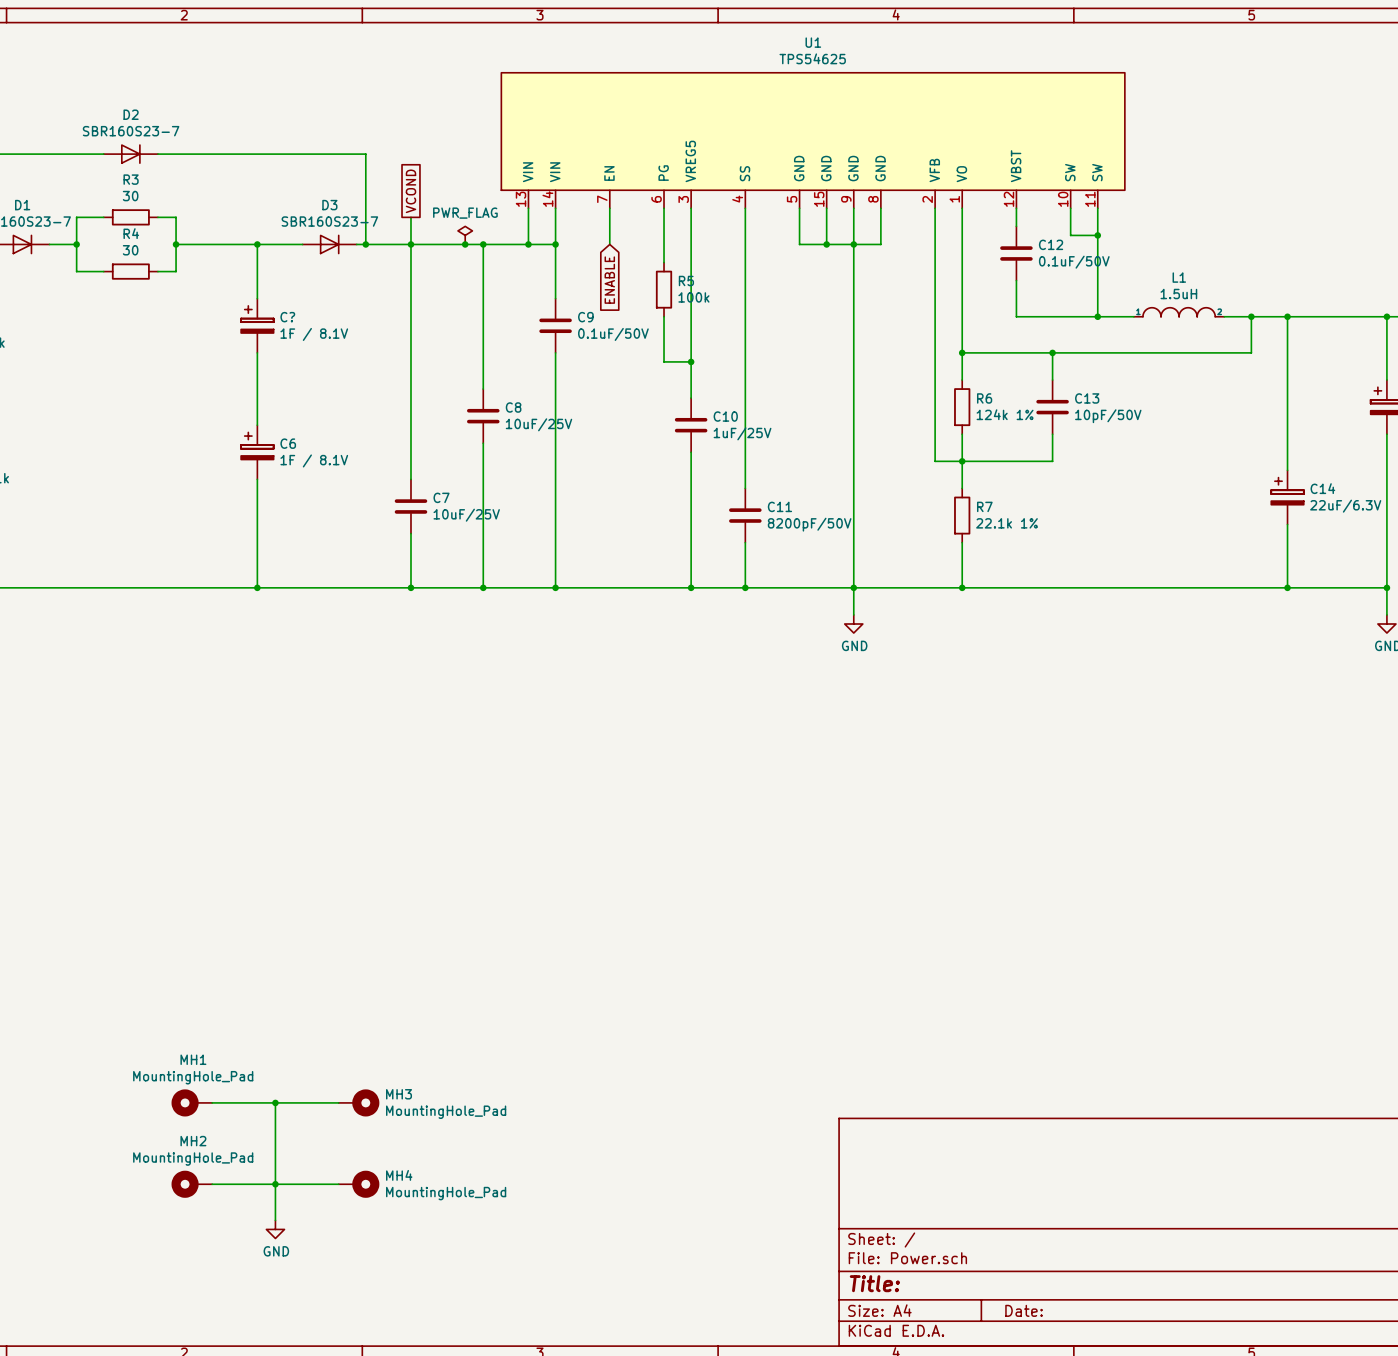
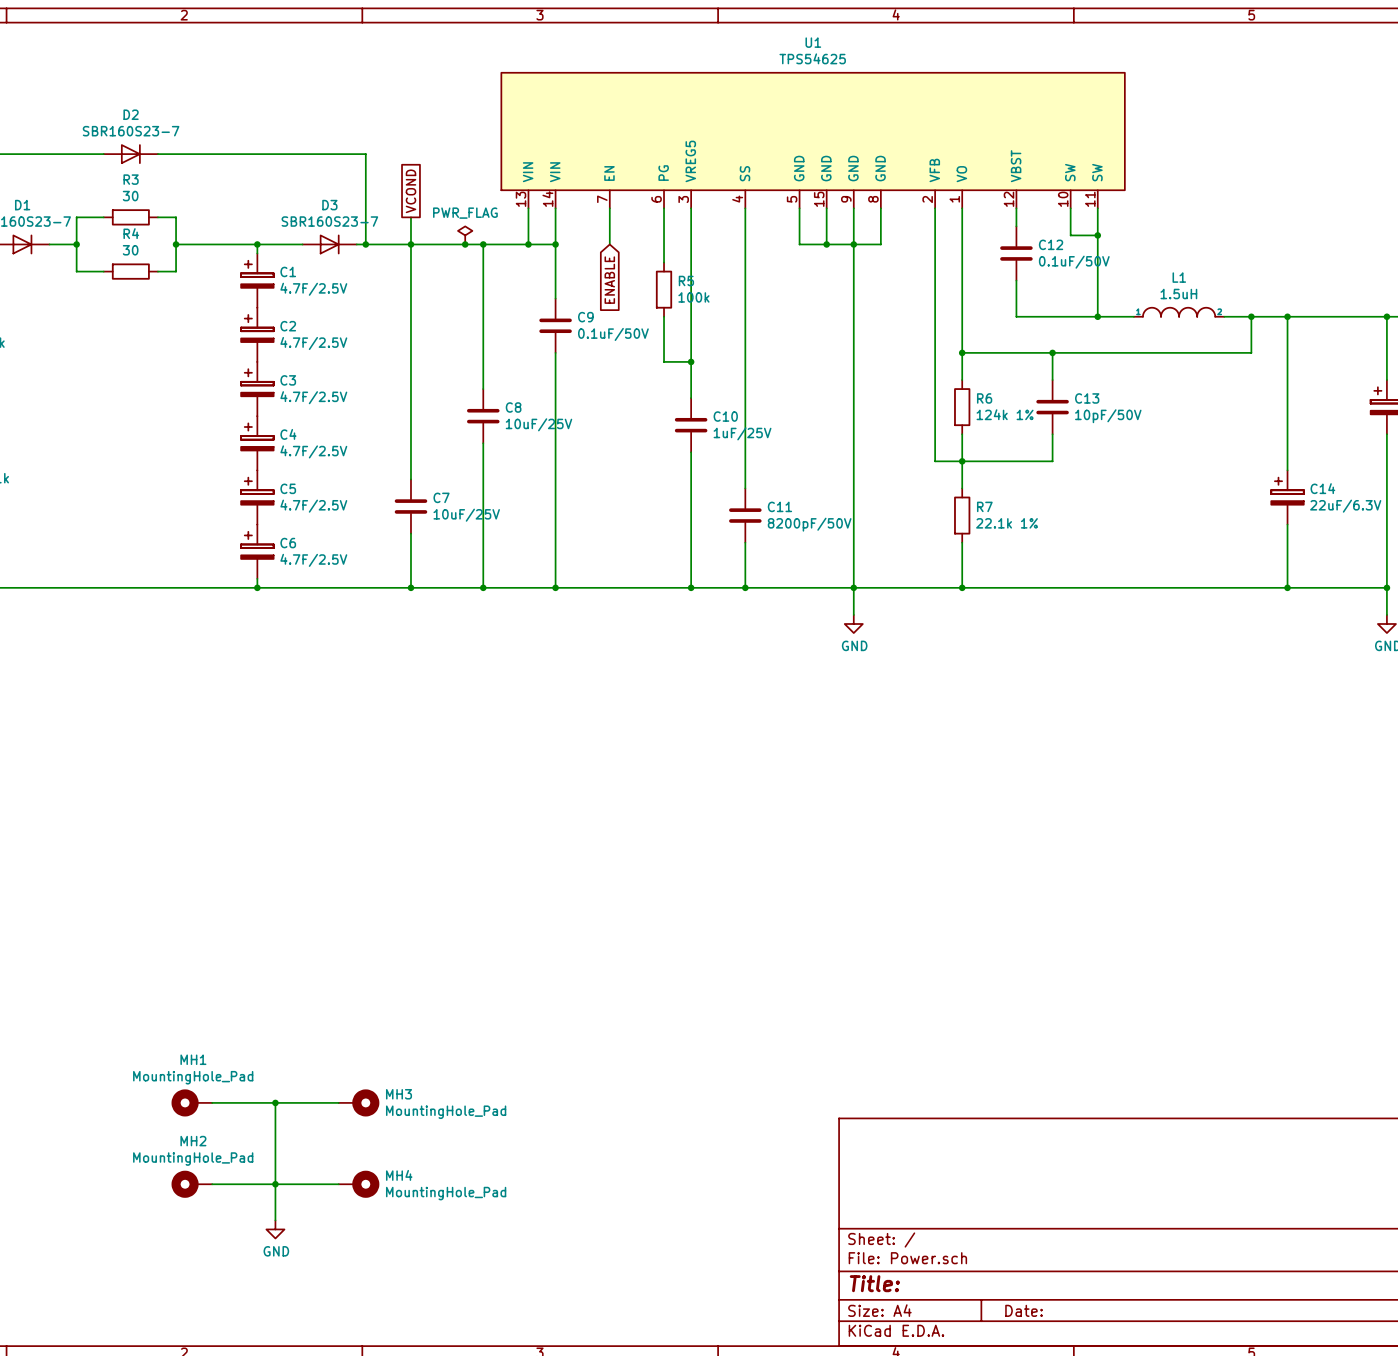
C1: none -> 4.7F/2.5V (257, 280)
C?: 1F / 8.1V (257, 325) -> none
C2: none -> 4.7F/2.5V (257, 334)
C3: none -> 4.7F/2.5V (257, 389)
C4: none -> 4.7F/2.5V (257, 443)
C6 position: (257, 452) -> (257, 551)
C6 value: 1F / 8.1V (314, 460) -> 4.7F/2.5V (313, 560)
C5: none -> 4.7F/2.5V (257, 497)

